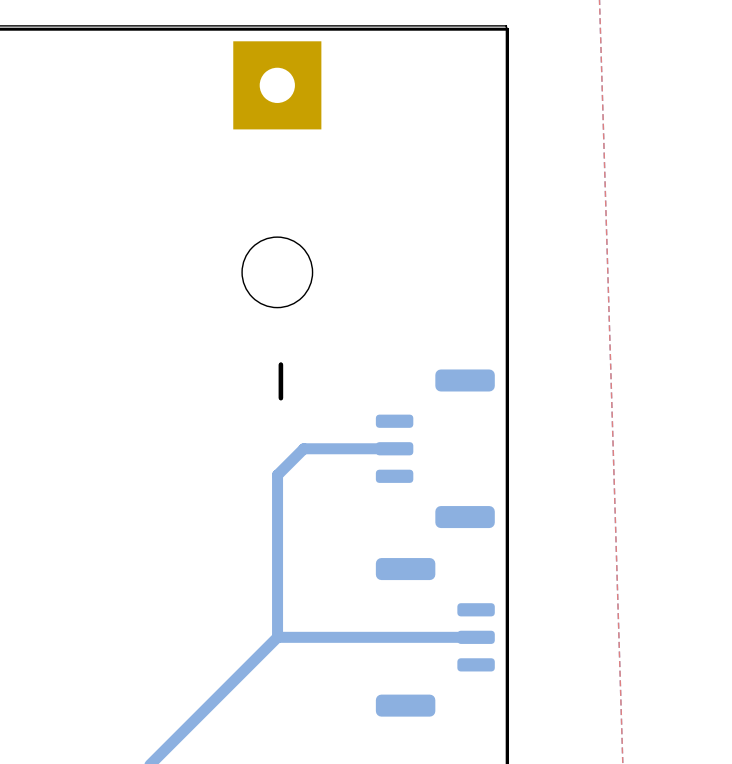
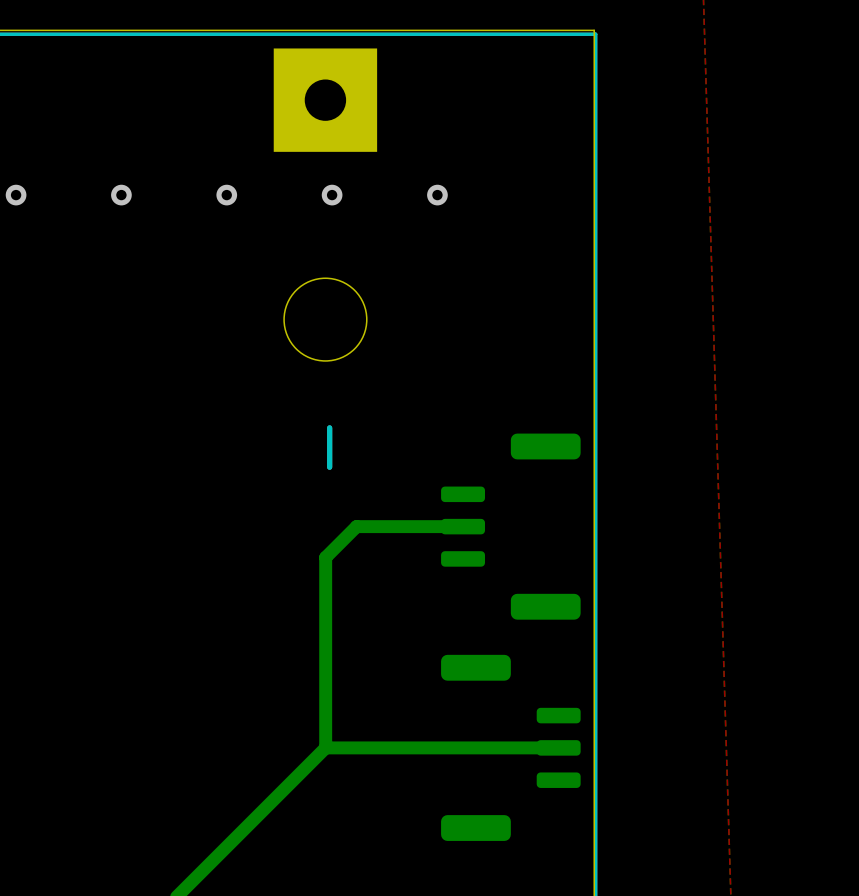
via: none -> (16, 195)
via: none -> (121, 195)
via: none -> (226, 195)
via: none -> (332, 195)
via: none -> (437, 195)

